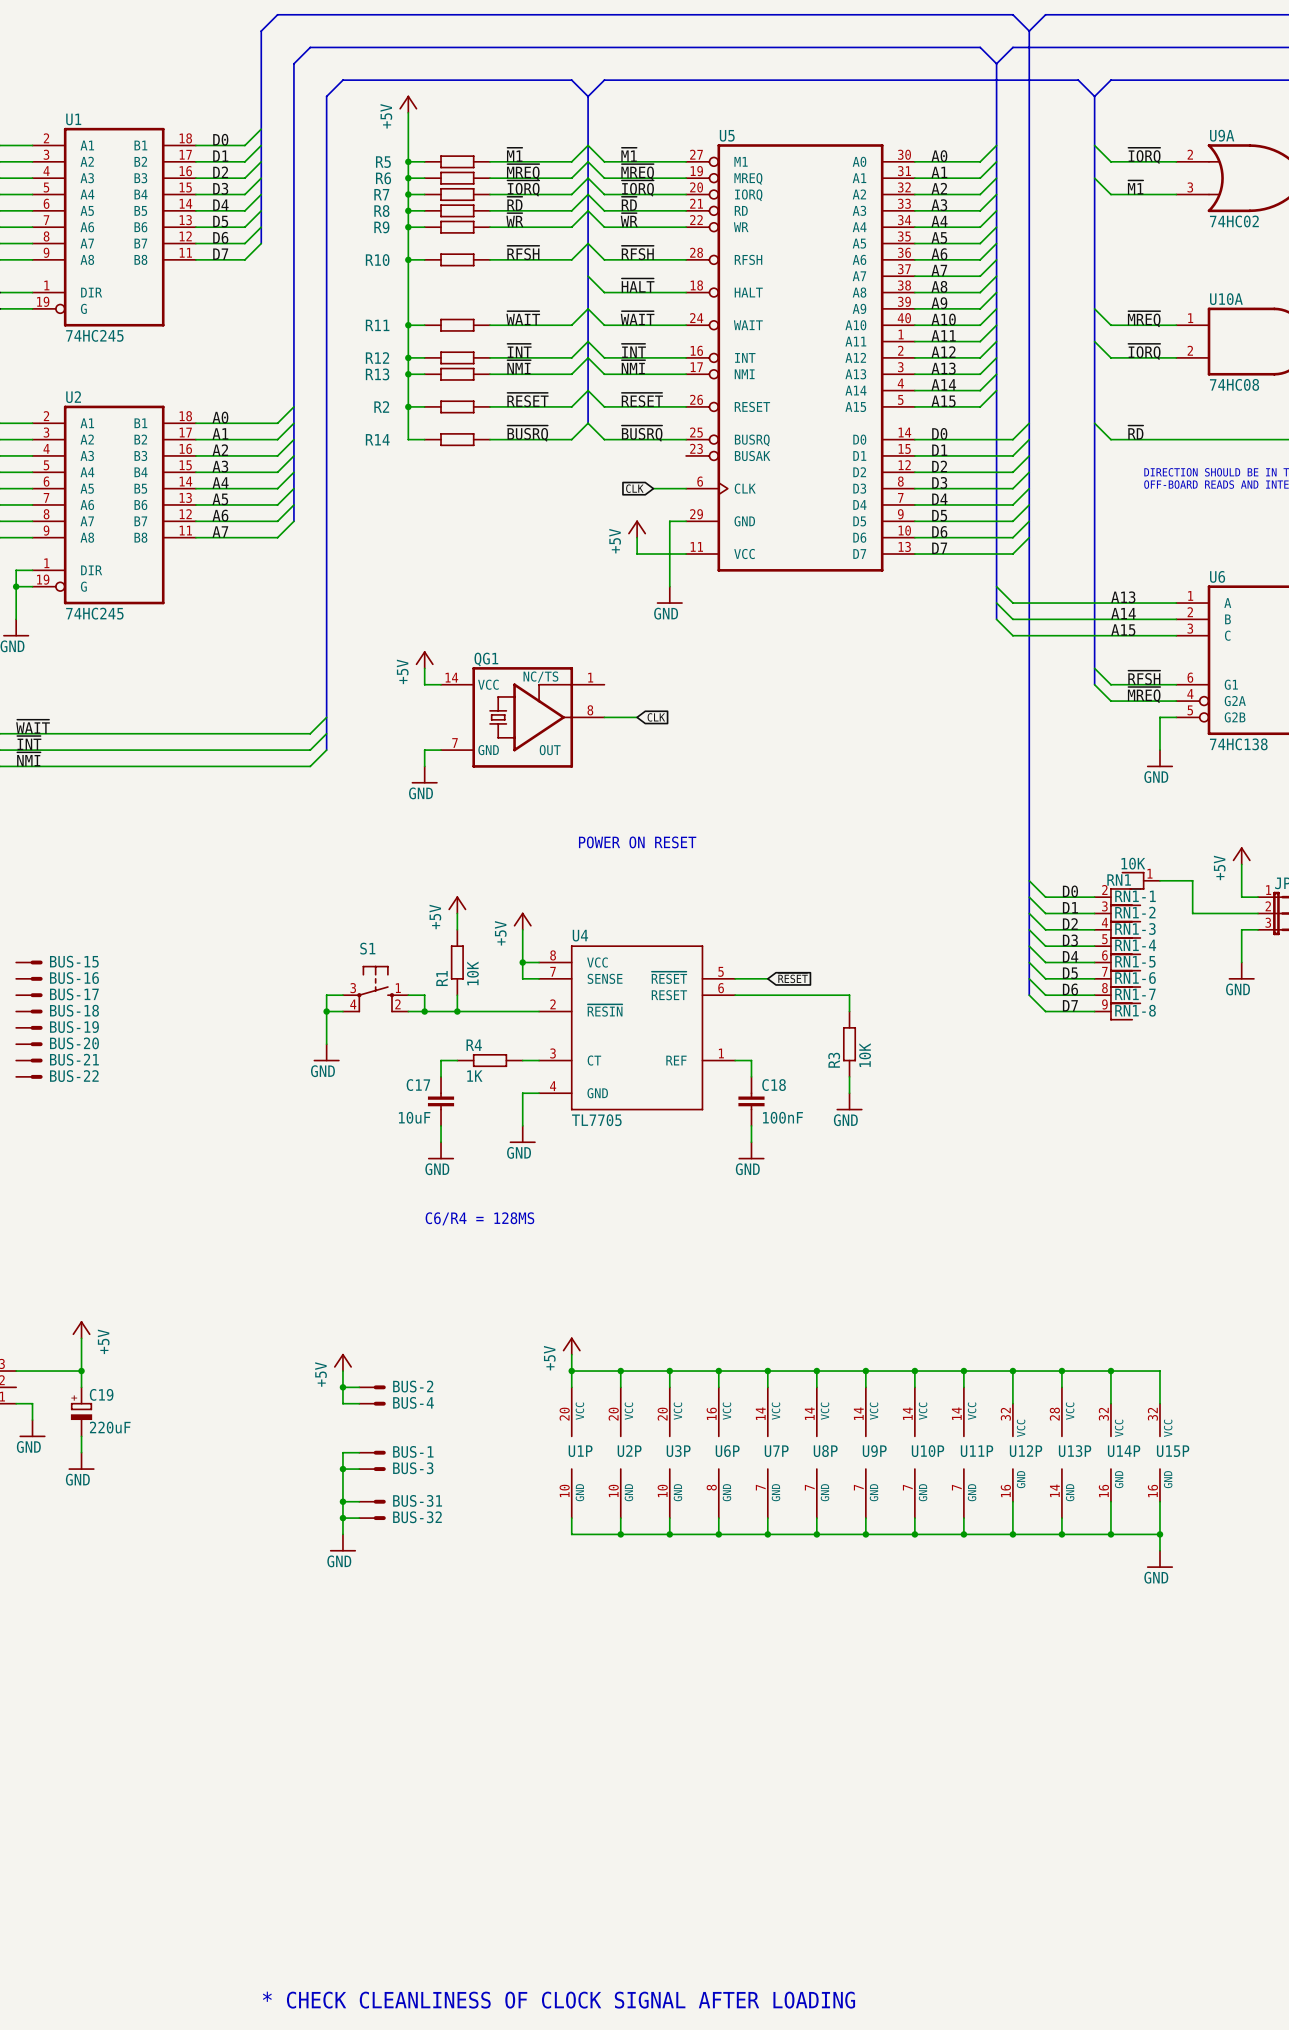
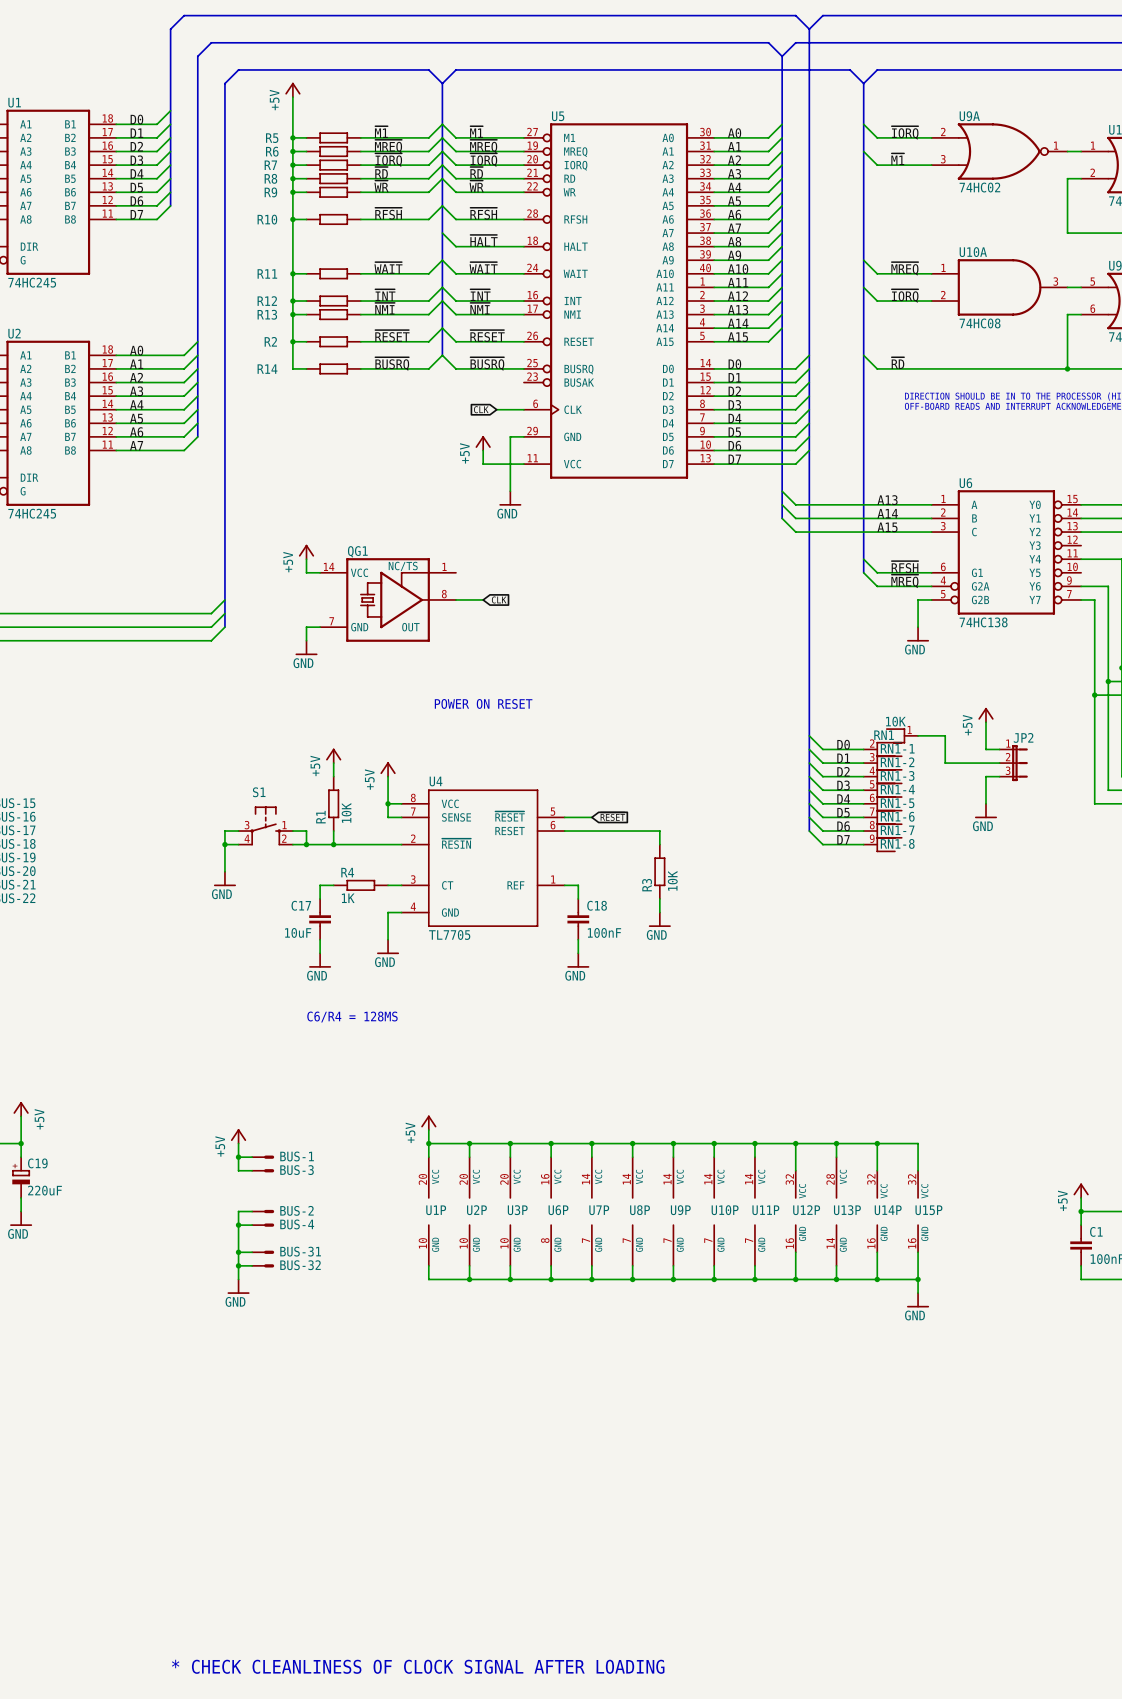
BUS-2 name: BUS-2 (413, 1386) -> BUS-1 (297, 1156)
BUS-4 name: BUS-4 (413, 1402) -> BUS-3 (297, 1170)
BUS-1 name: BUS-1 (413, 1451) -> BUS-2 (296, 1210)
BUS-3 name: BUS-3 (413, 1468) -> BUS-4 (297, 1224)

